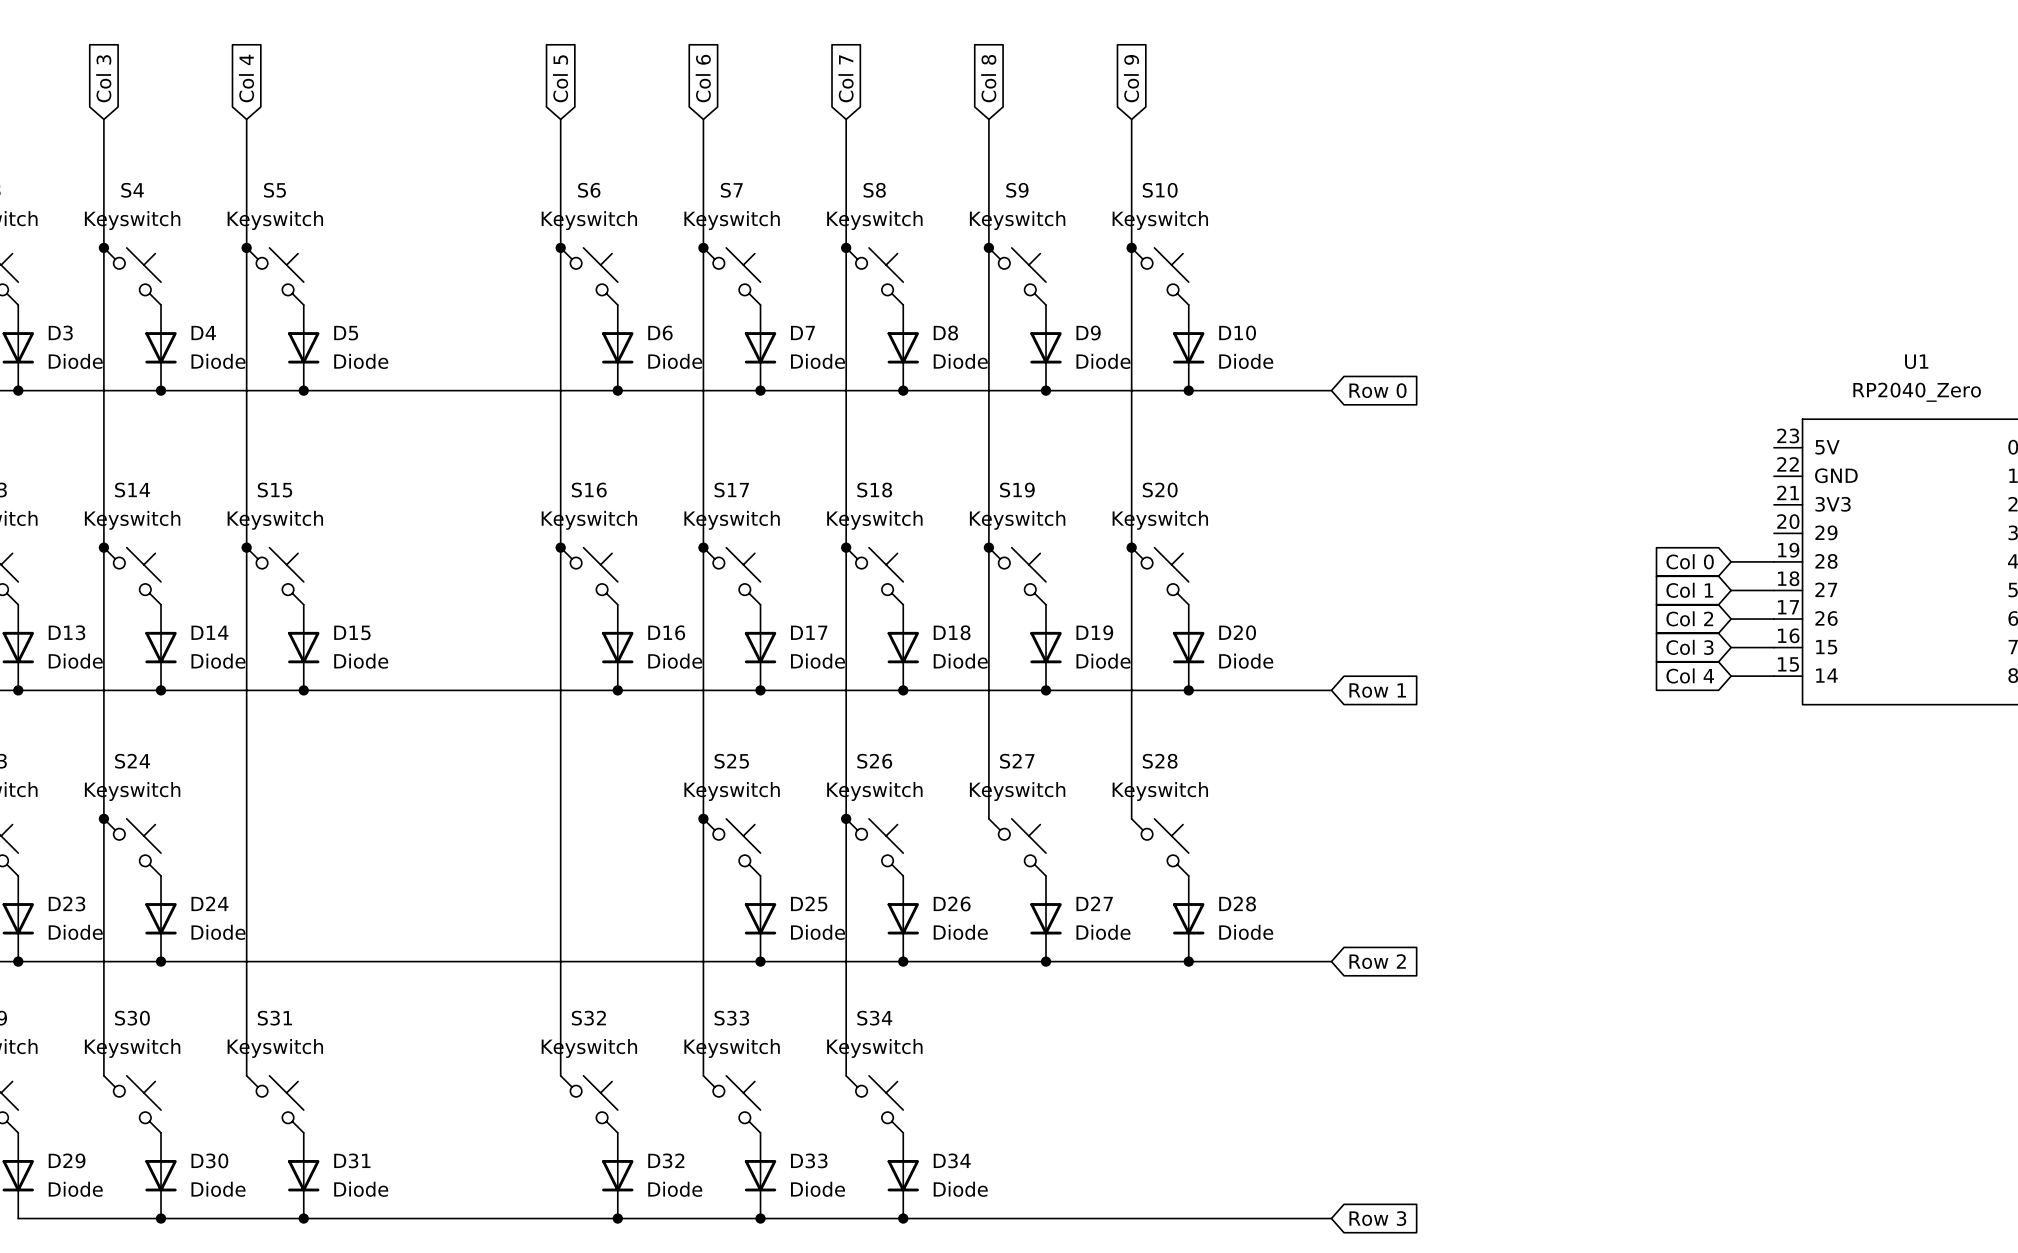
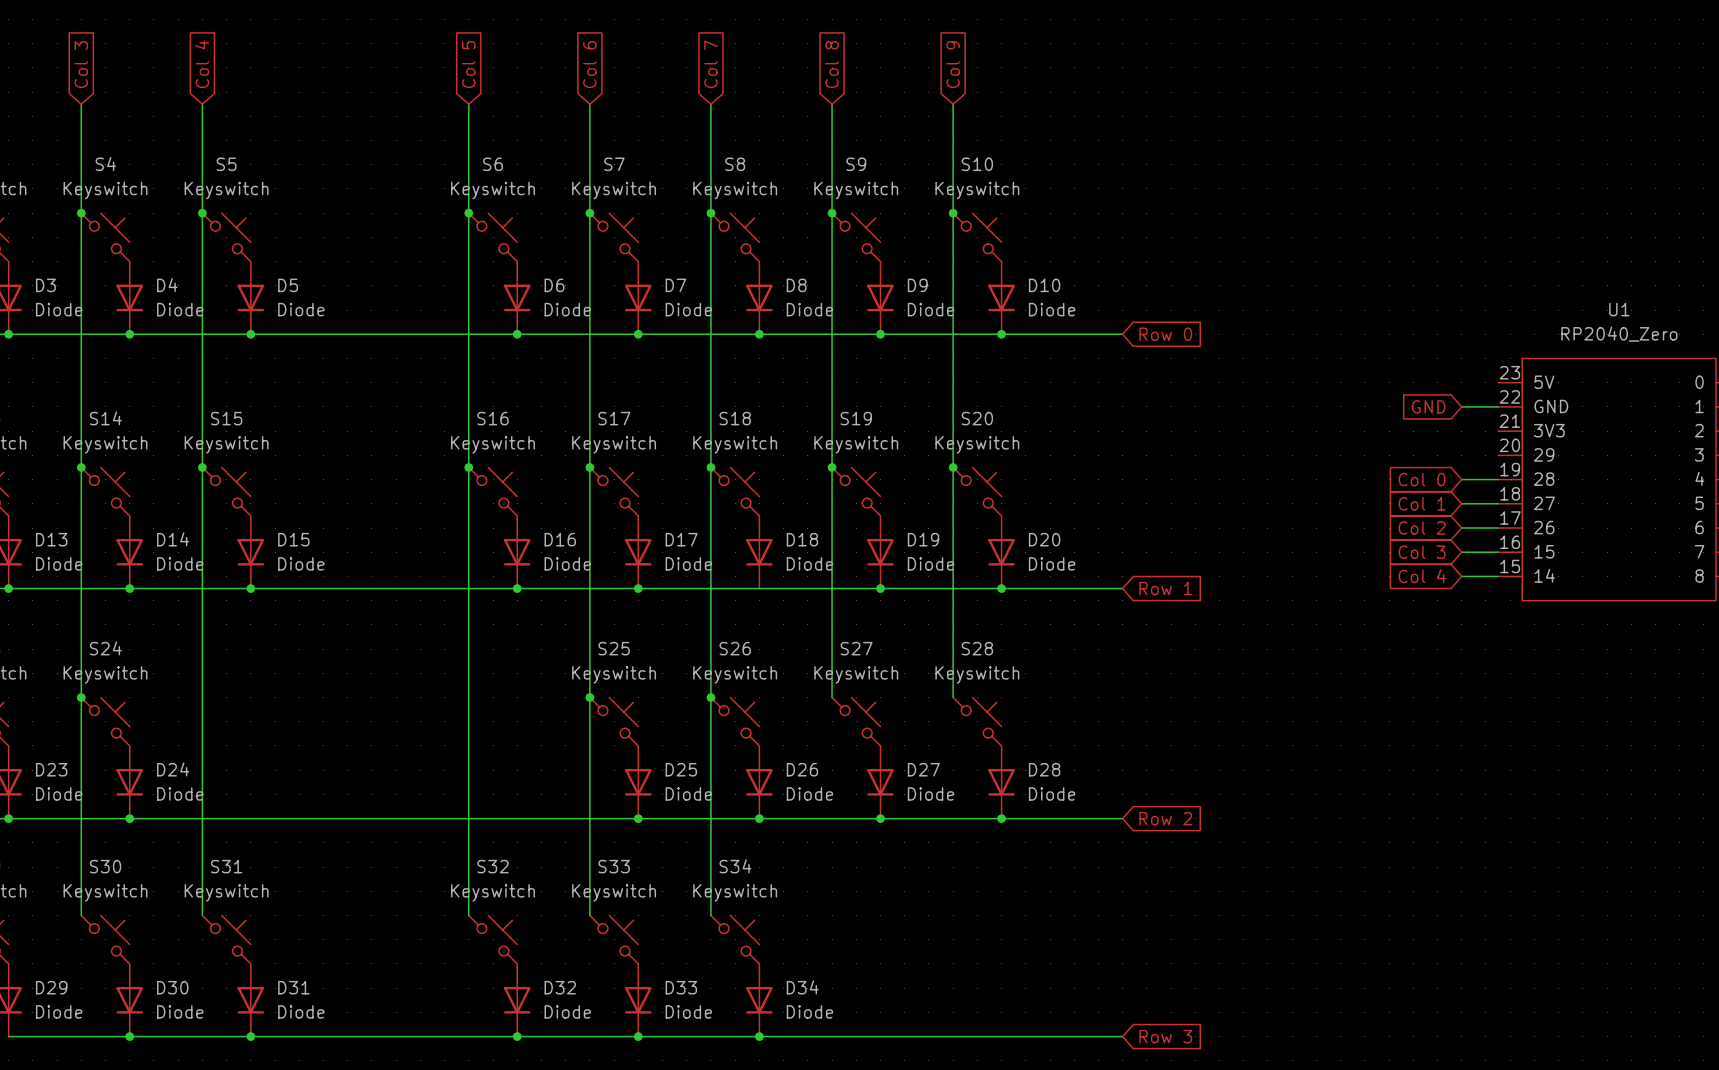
global label: none -> GND (1428, 406)
wire: none -> (1461, 406) (1498, 406)
junction: (903, 690) -> none

